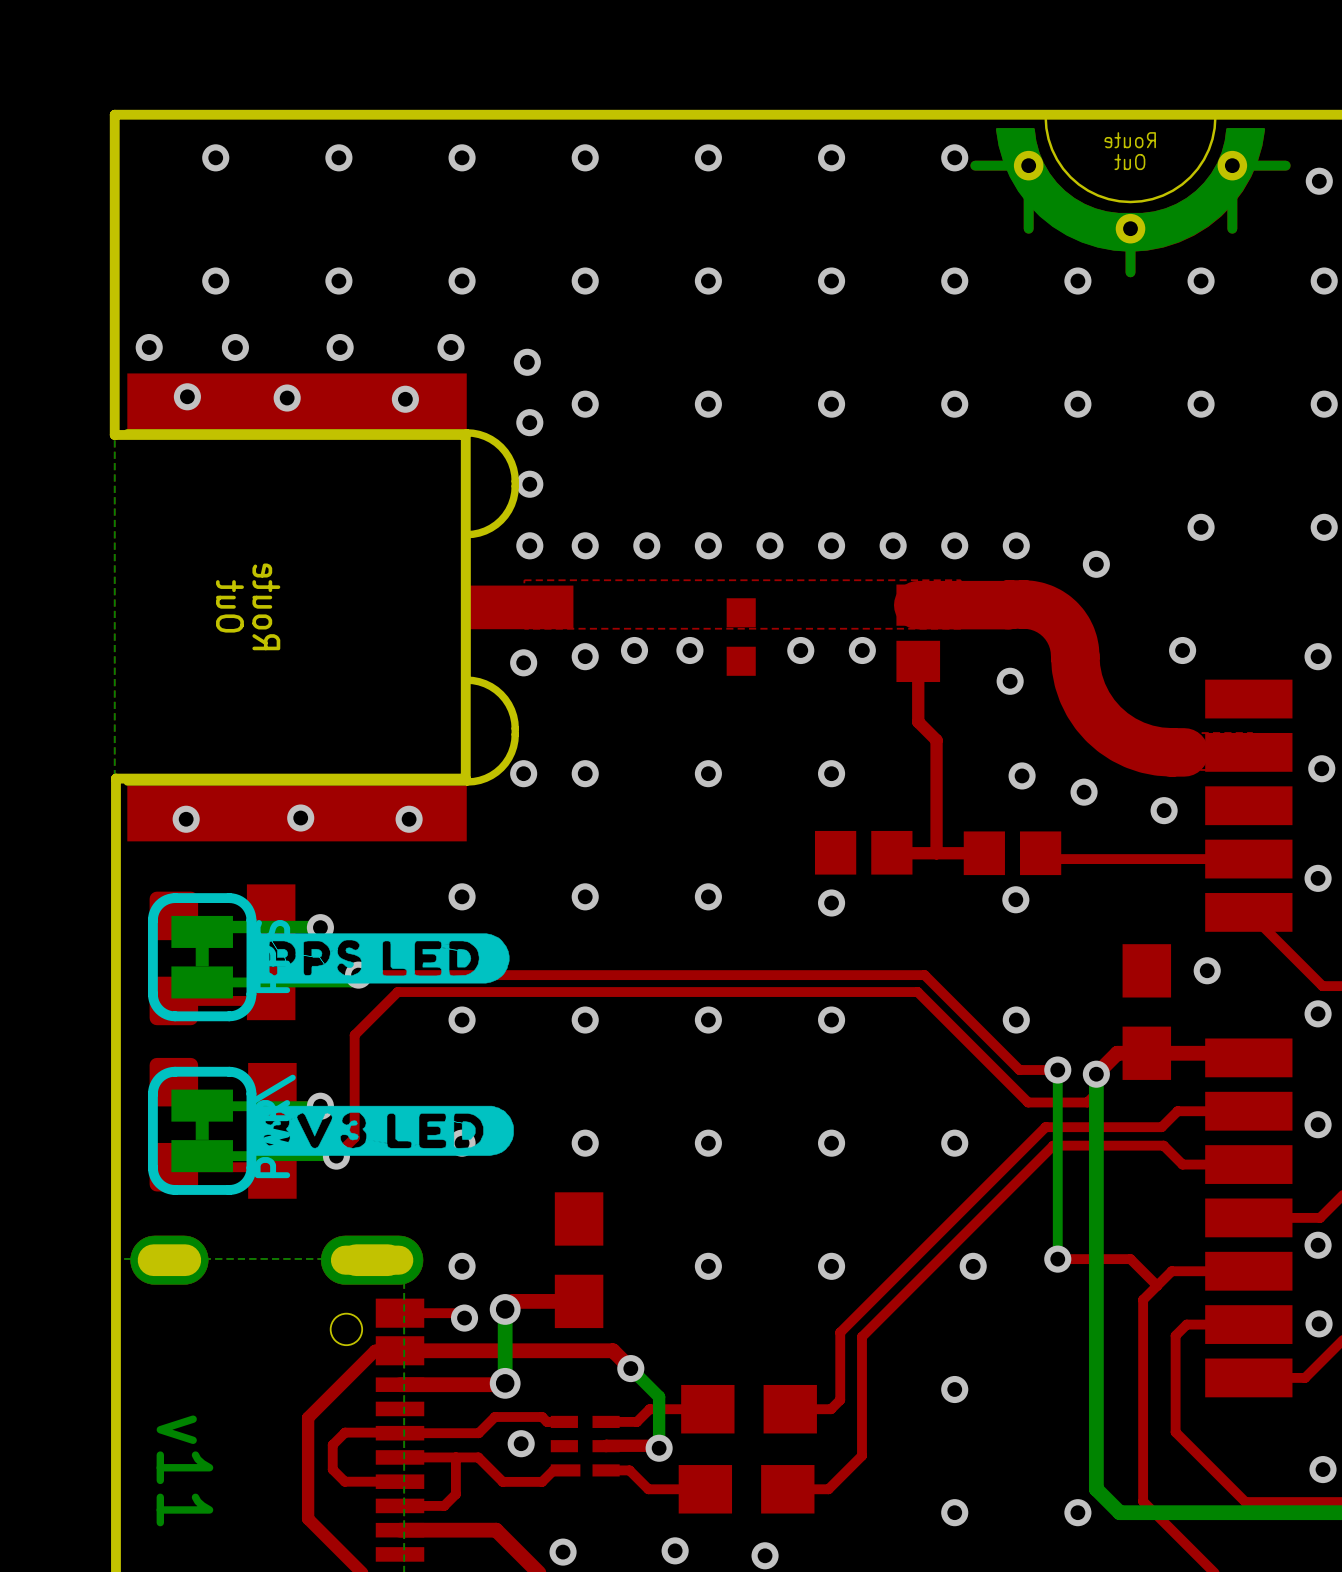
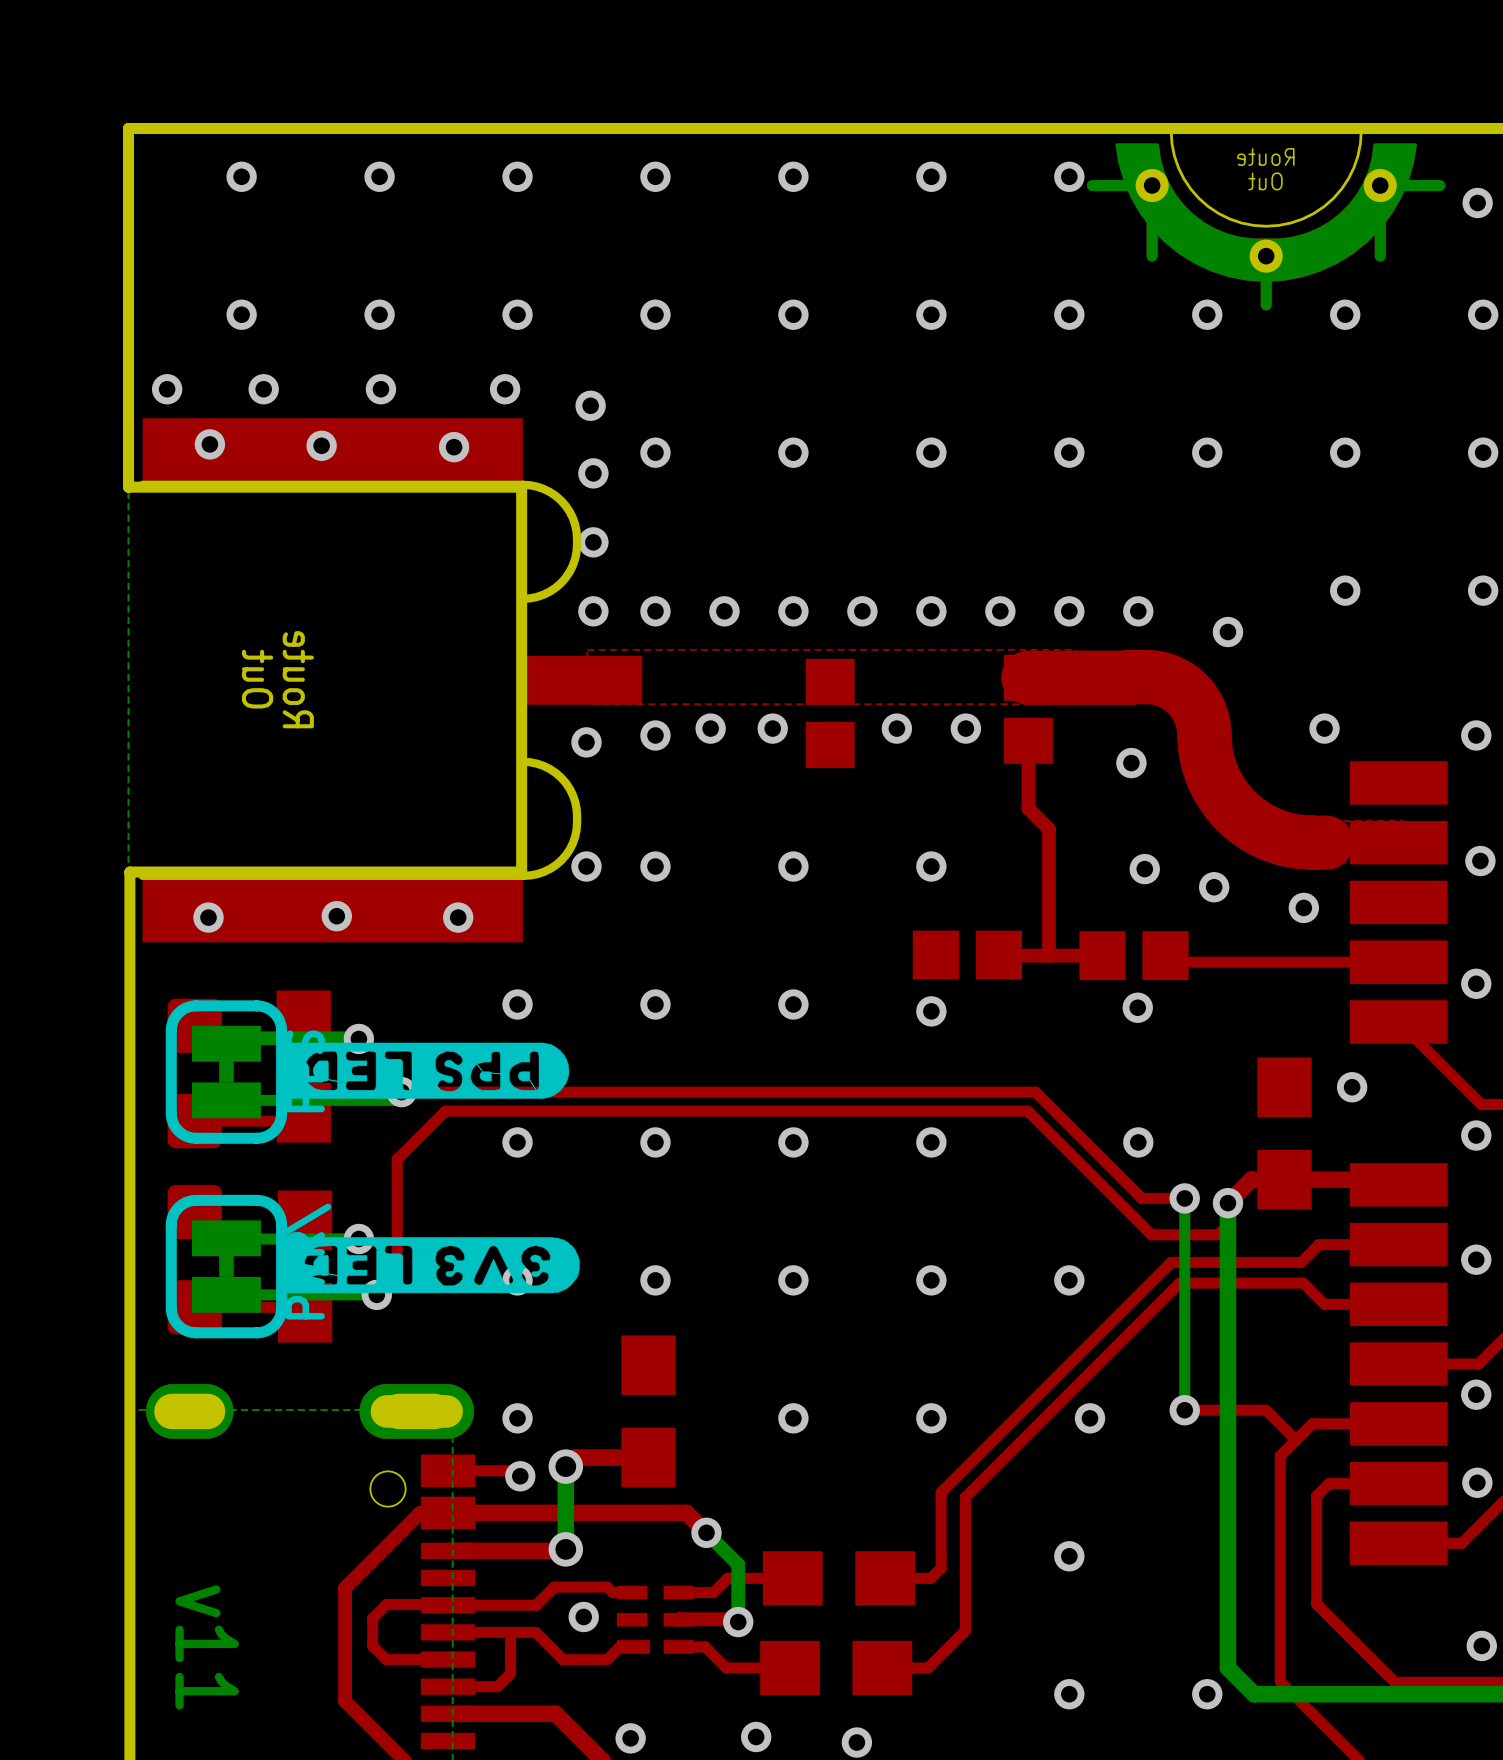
part footprint: [726, 598, 756, 676] -> [805, 658, 855, 769]
drawing shape: [254, 933, 510, 984] -> [284, 1042, 570, 1099]
drawing shape: [250, 1105, 514, 1156] -> [284, 1237, 580, 1294]

